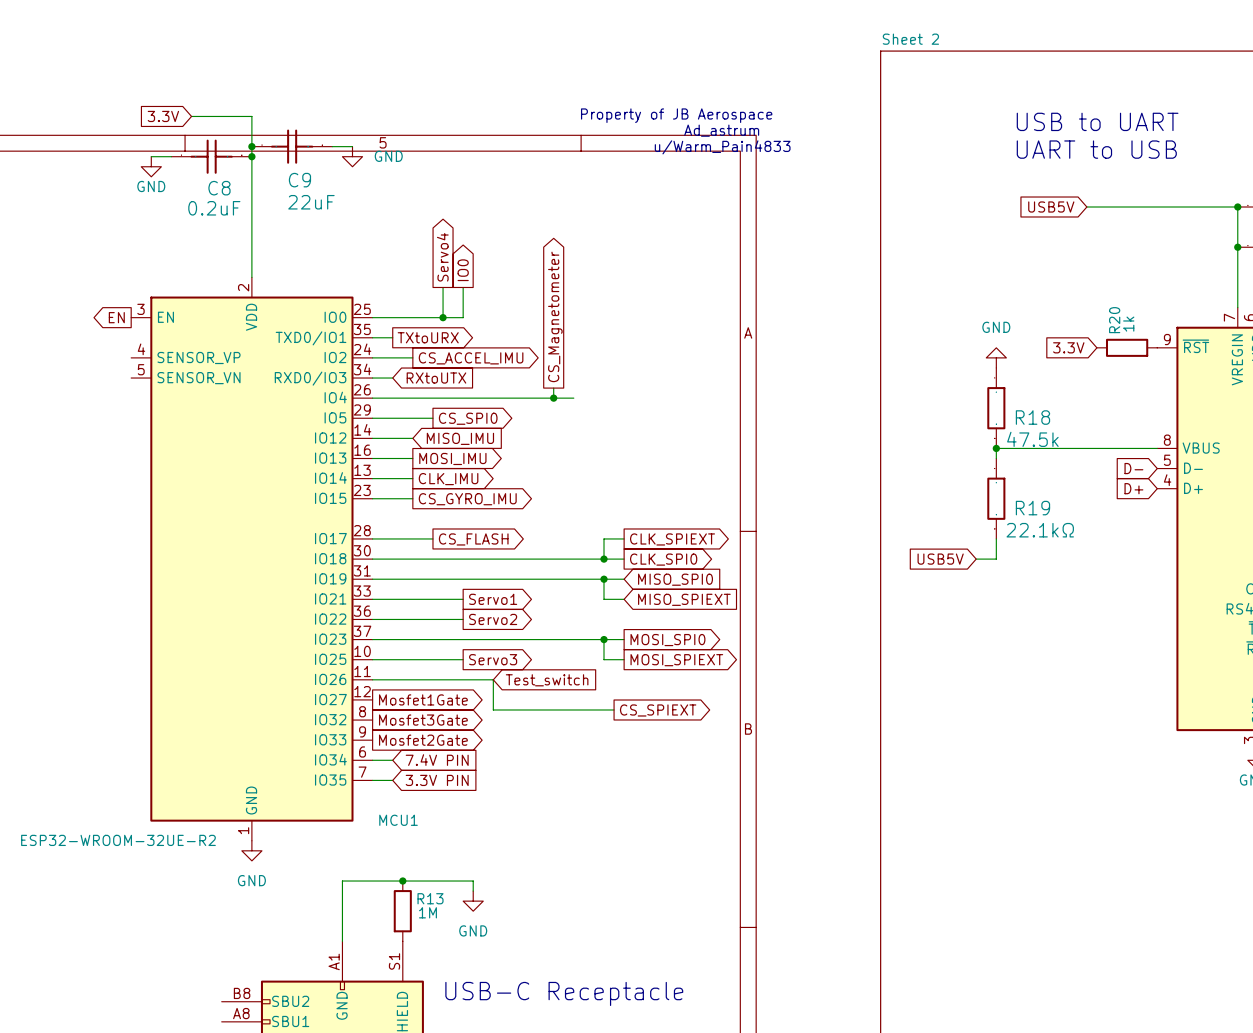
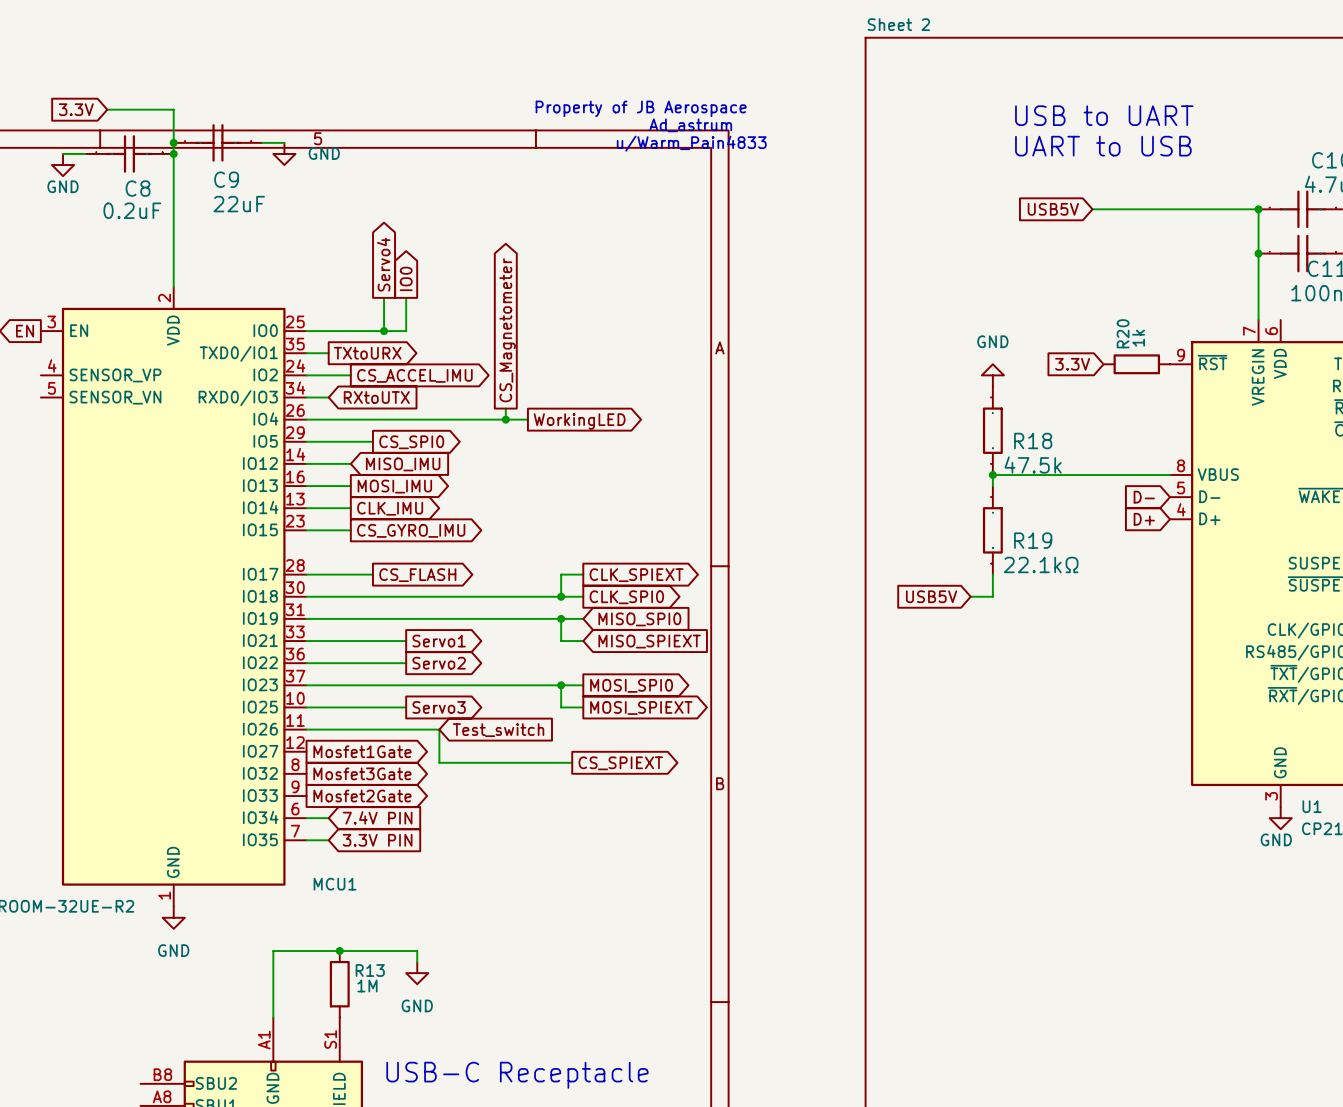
global label: none -> WorkingLED (579, 421)

